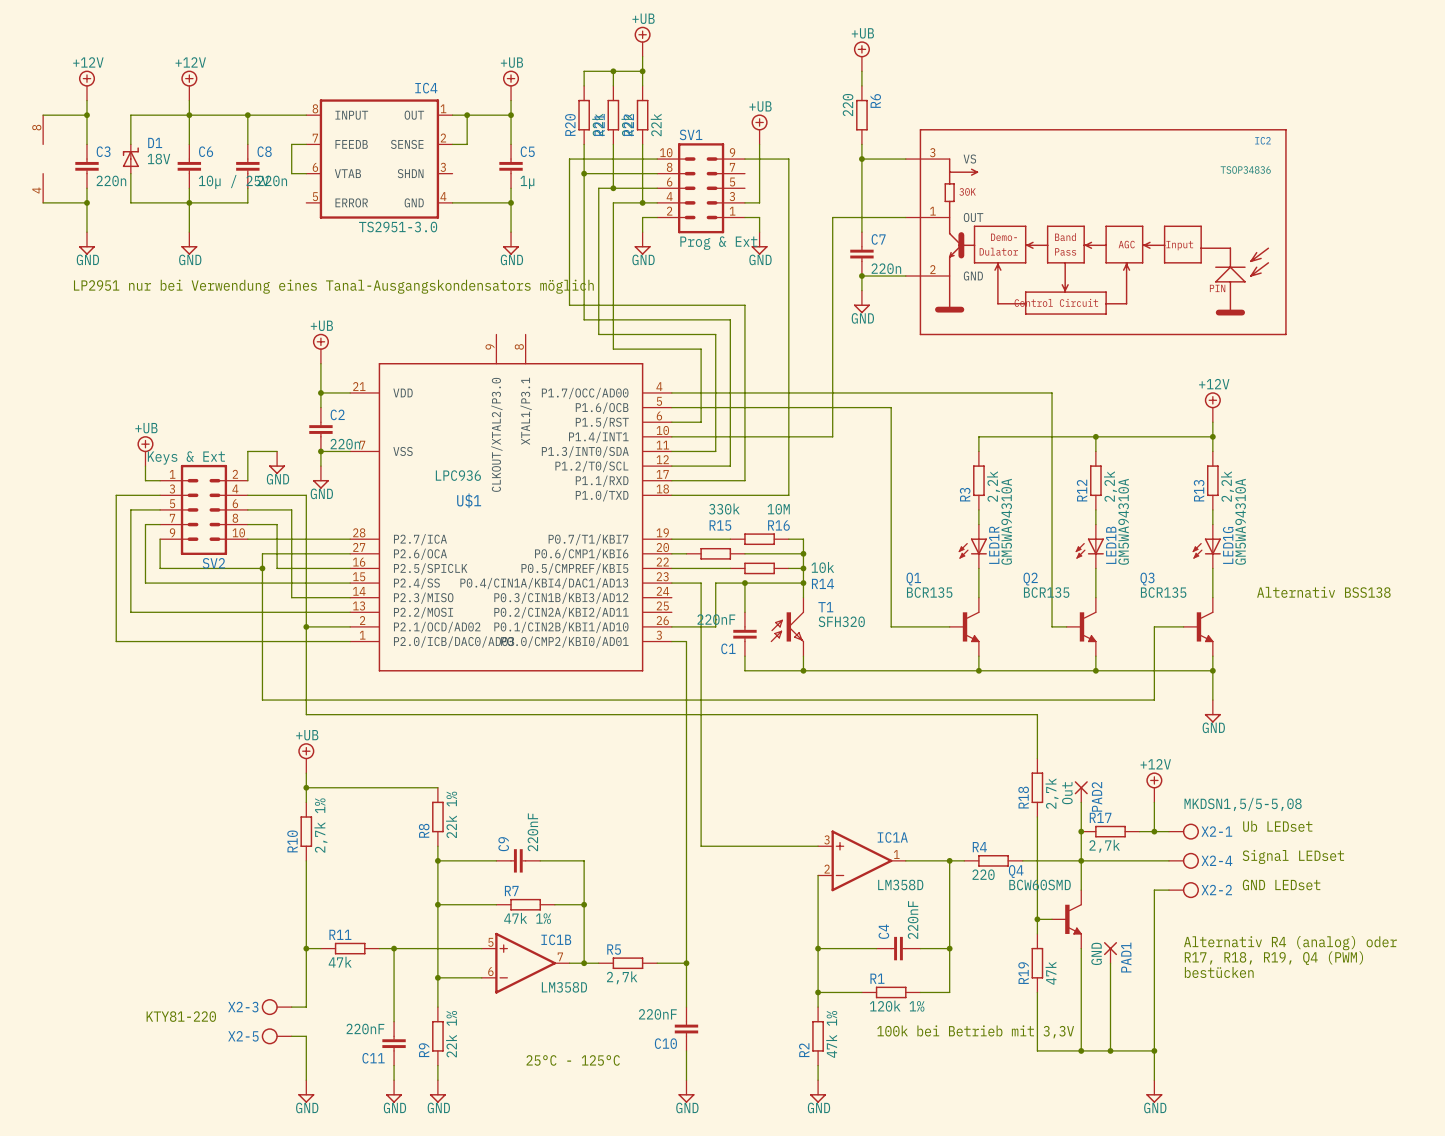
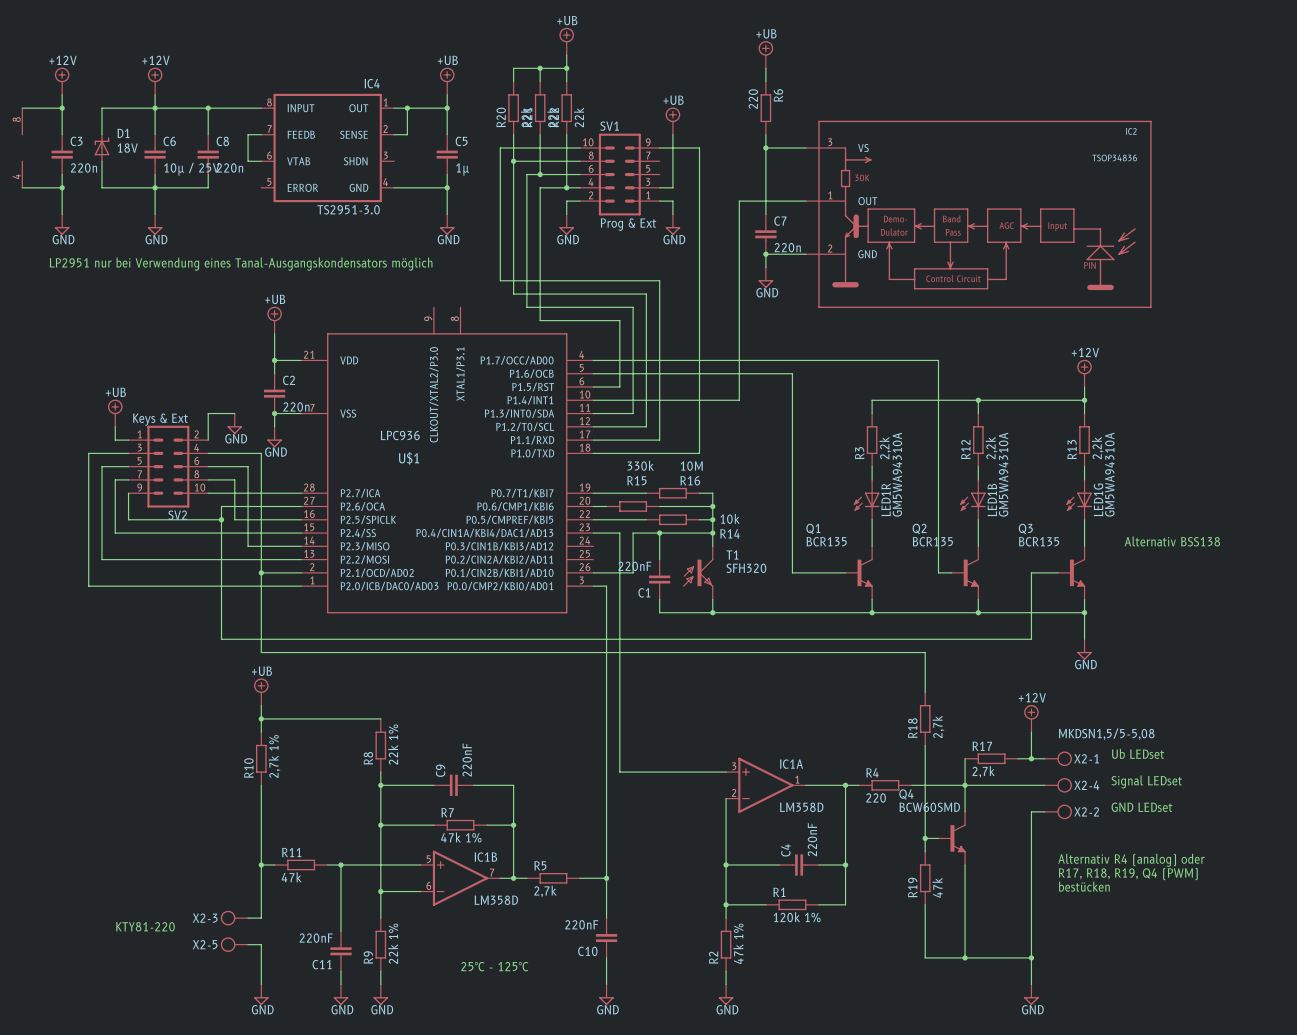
PAD2: Out (1081, 791) -> none
wire: (1081, 802) (1081, 831) -> none
junction: (1081, 831) -> none
PAD1: GND (1110, 952) -> none
wire: (1110, 963) (1110, 1050) -> none
text: 100k bei Betrieb mit 3,3V (975, 1031) -> none
junction: (1110, 1050) -> none

